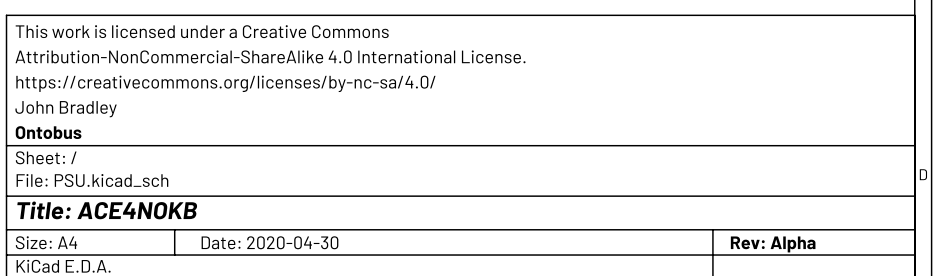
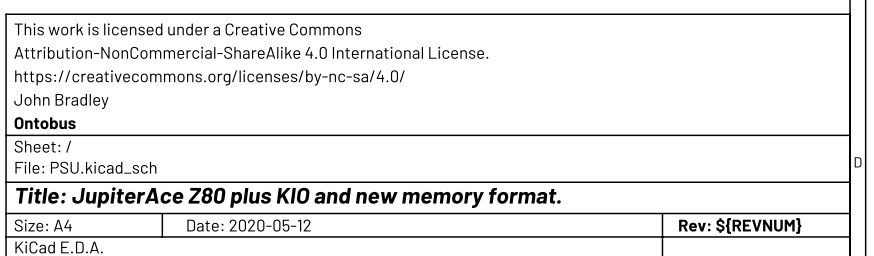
title block: Title: ACE4NOKB (107, 210) -> Title: JupiterAce Z80 plus KIO and new memory format. (288, 197)
title block: Date: 2020-04-30 (269, 242) -> Date: 2020-05-12 (249, 225)
title block: Rev: Alpha (773, 244) -> Rev: ${REVNUM} (740, 225)

